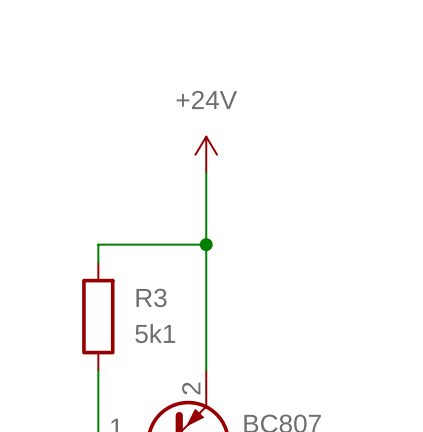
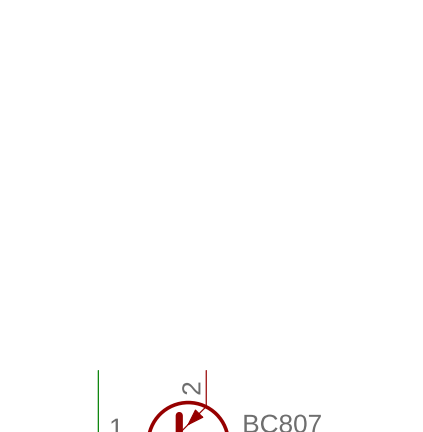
power symbol: +24V (206, 154) -> none
wire: (206, 172) (206, 370) -> none
wire: (206, 244) (98, 244) (98, 262) -> none
junction: (206, 244) -> none
R3: 5k1 (98, 316) -> none

